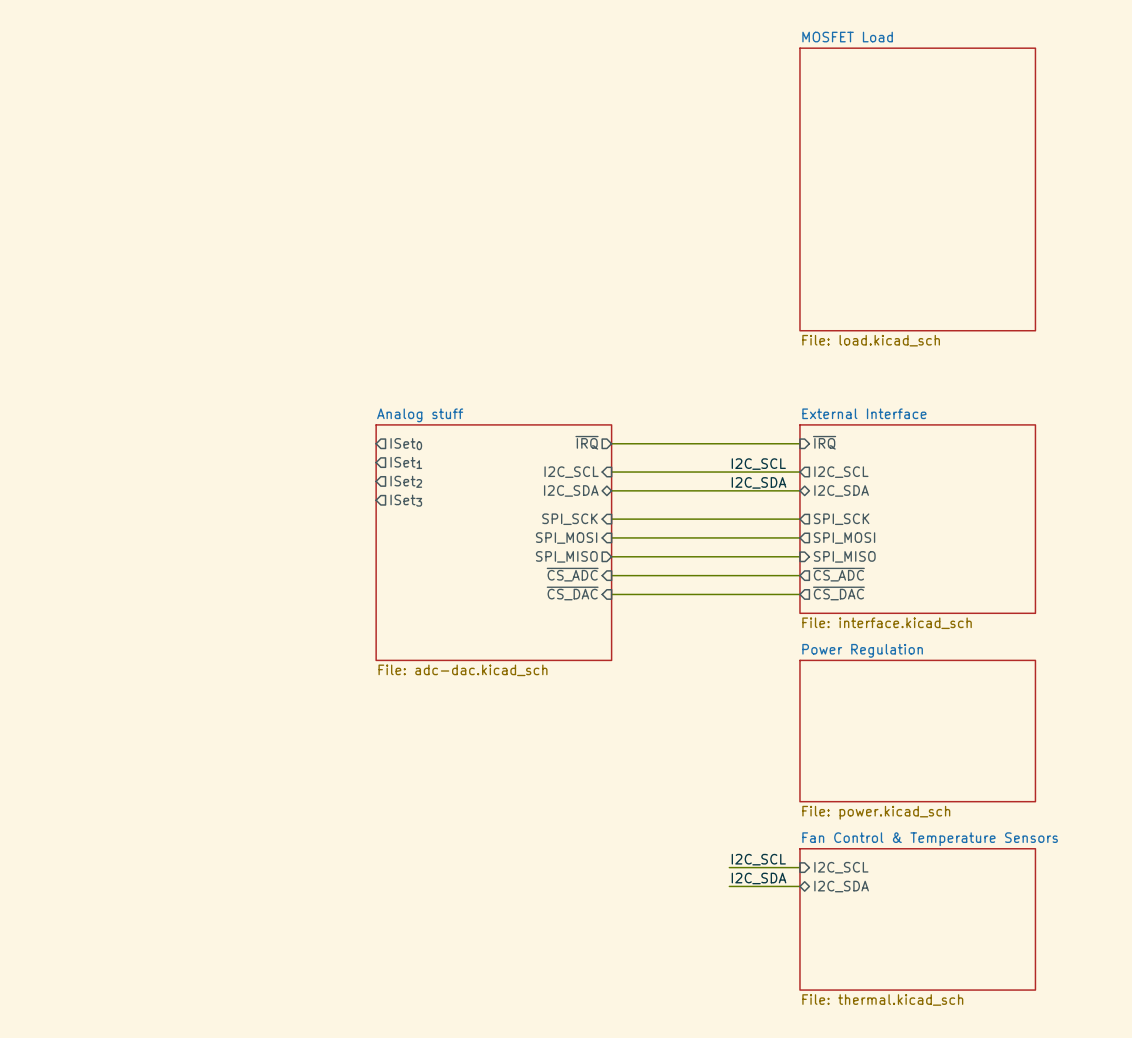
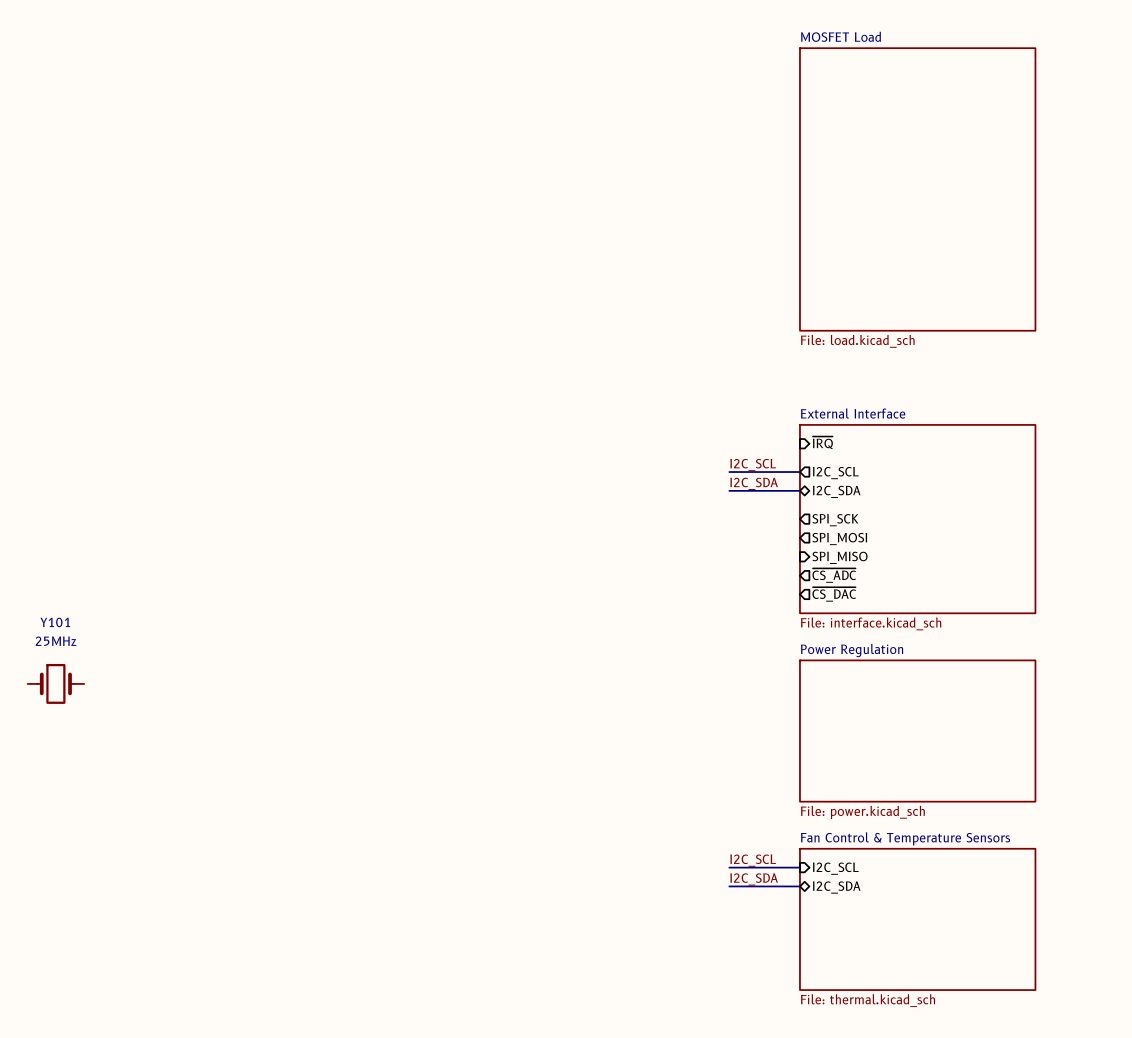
sheet pin: ~{IRQ} (587, 442) -> none
wire: (611, 443) (799, 443) -> none
sheet pin: ISet0 (406, 444) -> none
sheet pin: ISet1 (406, 462) -> none
sheet pin: I2C_SCL (571, 472) -> none
wire: (611, 472) (729, 472) -> none
sheet pin: ISet2 (406, 481) -> none
sheet pin: I2C_SDA (571, 490) -> none
wire: (611, 490) (729, 490) -> none
sheet pin: ISet3 (406, 500) -> none
sheet pin: SPI_SCK (569, 519) -> none
wire: (611, 519) (799, 519) -> none
wire: (611, 537) (799, 537) -> none
sheet pin: SPI_MOSI (566, 538) -> none
sheet Analog stuff: File: adc-dac.kicad_sch (493, 542) -> none
sheet pin: SPI_MISO (566, 556) -> none
wire: (611, 556) (799, 556) -> none
sheet pin: ~{CS_ADC} (572, 574) -> none
wire: (611, 575) (799, 575) -> none
sheet pin: ~{CS_DAC} (572, 593) -> none
wire: (611, 594) (799, 594) -> none
Y101: none -> 25MHz (55, 683)

